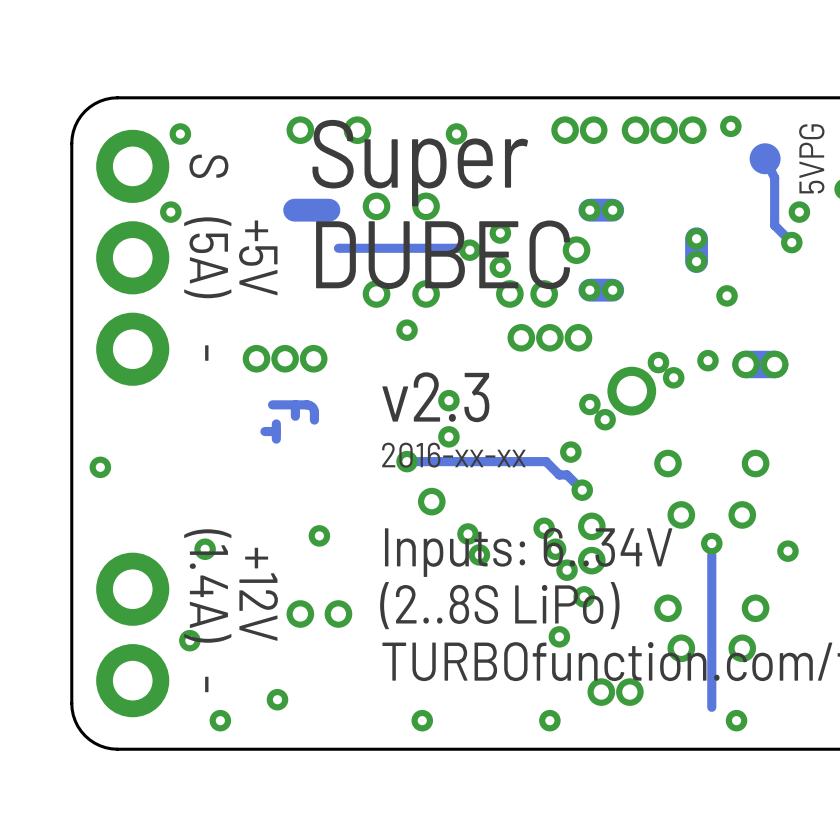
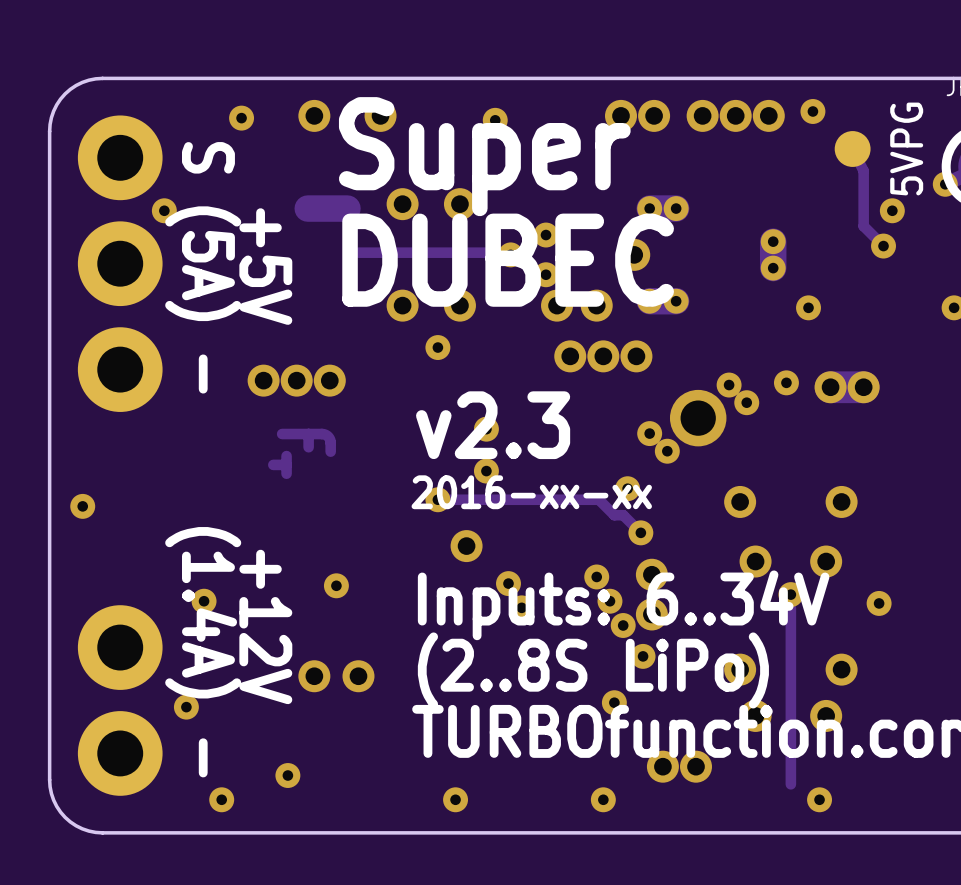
via position: (180, 133) -> (241, 118)

